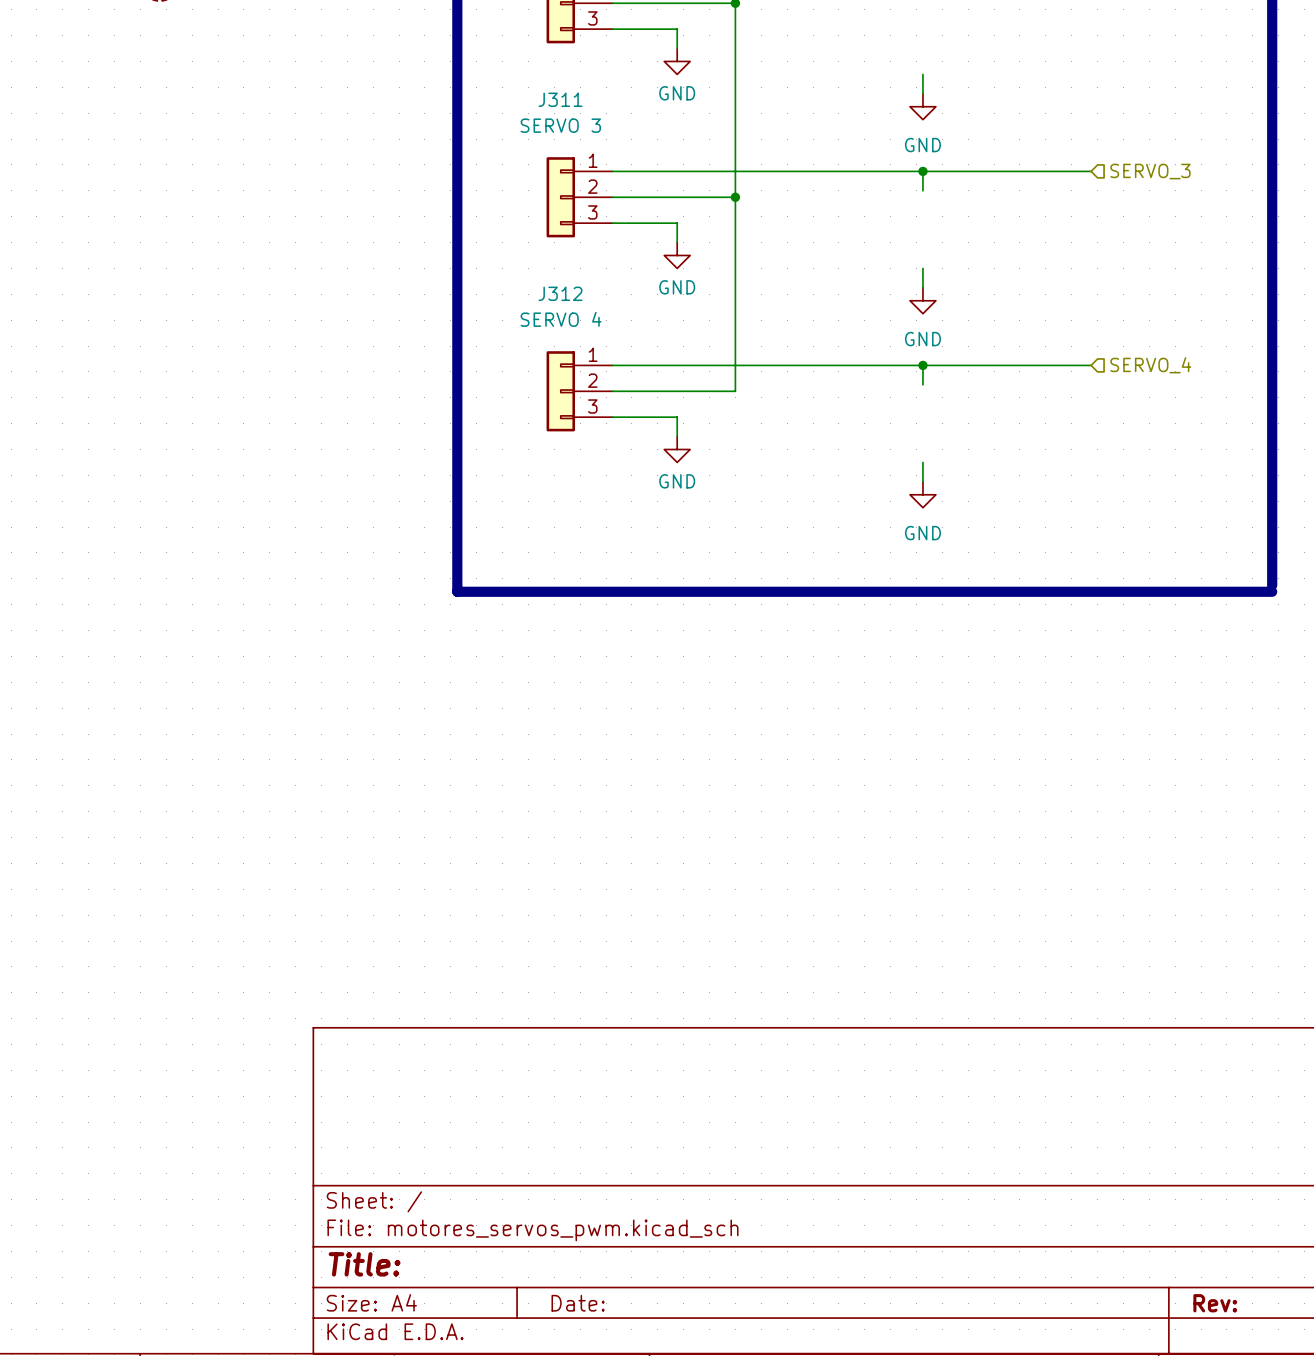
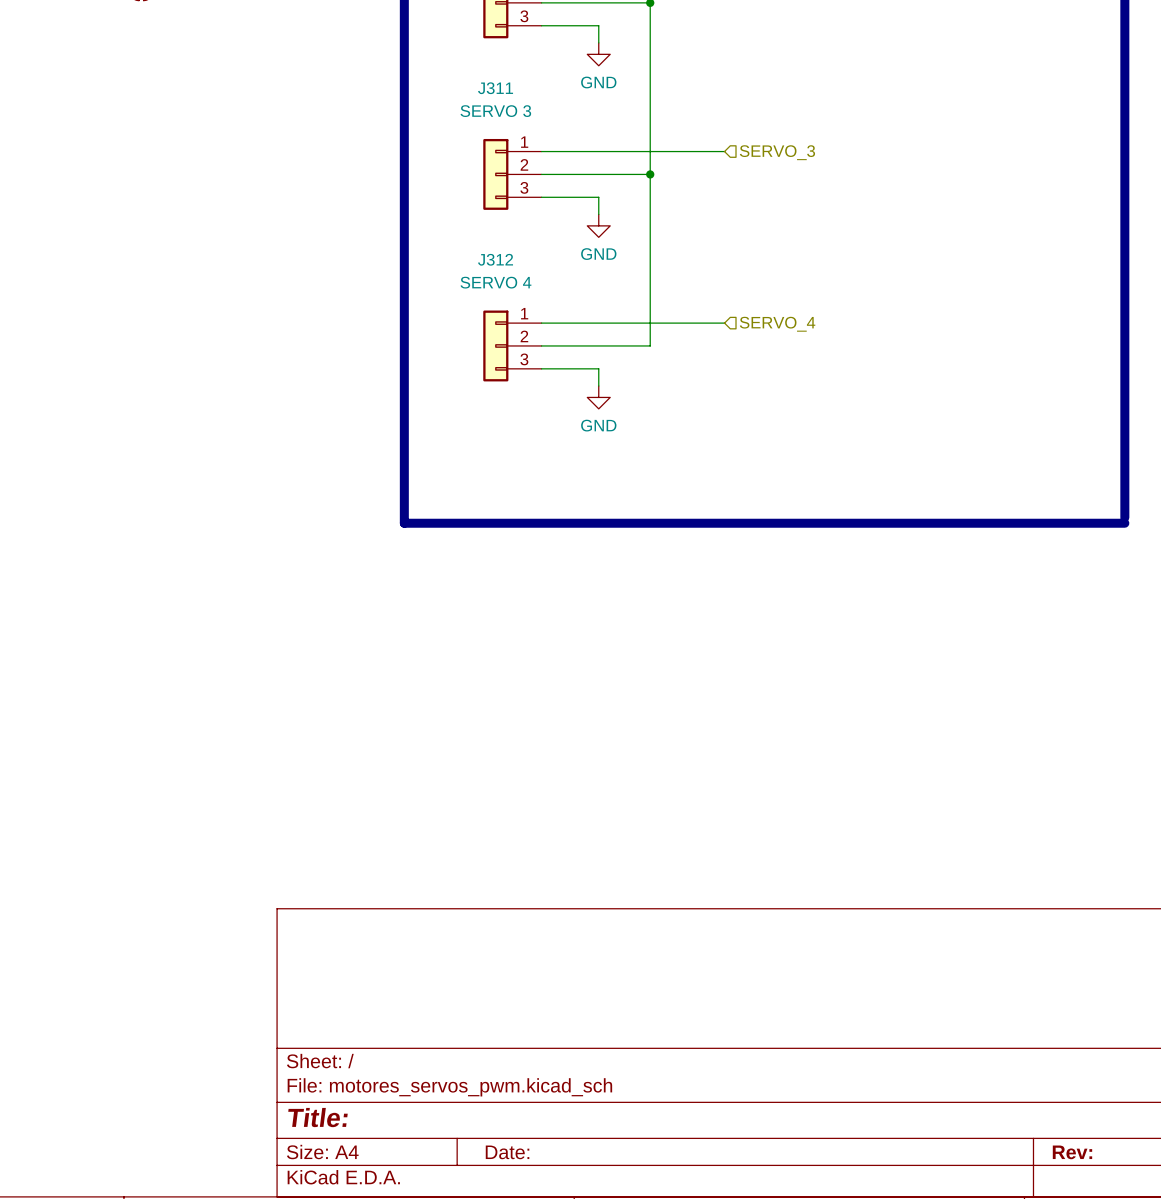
wire: (922, 74) (922, 93) -> none
power symbol: GND (922, 106) -> none
wire: (819, 171) (1091, 171) -> none
hierarchical label: none -> SERVO_3 (777, 152)
wire: (922, 171) (922, 190) -> none
junction: (922, 171) -> none
hierarchical label: SERVO_3 (1150, 171) -> none
wire: (922, 268) (922, 287) -> none
power symbol: GND (922, 300) -> none
wire: (819, 365) (1091, 365) -> none
hierarchical label: none -> SERVO_4 (777, 324)
wire: (922, 365) (922, 384) -> none
junction: (922, 365) -> none
hierarchical label: SERVO_4 (1150, 365) -> none
wire: (922, 462) (922, 481) -> none
power symbol: GND (922, 494) -> none

